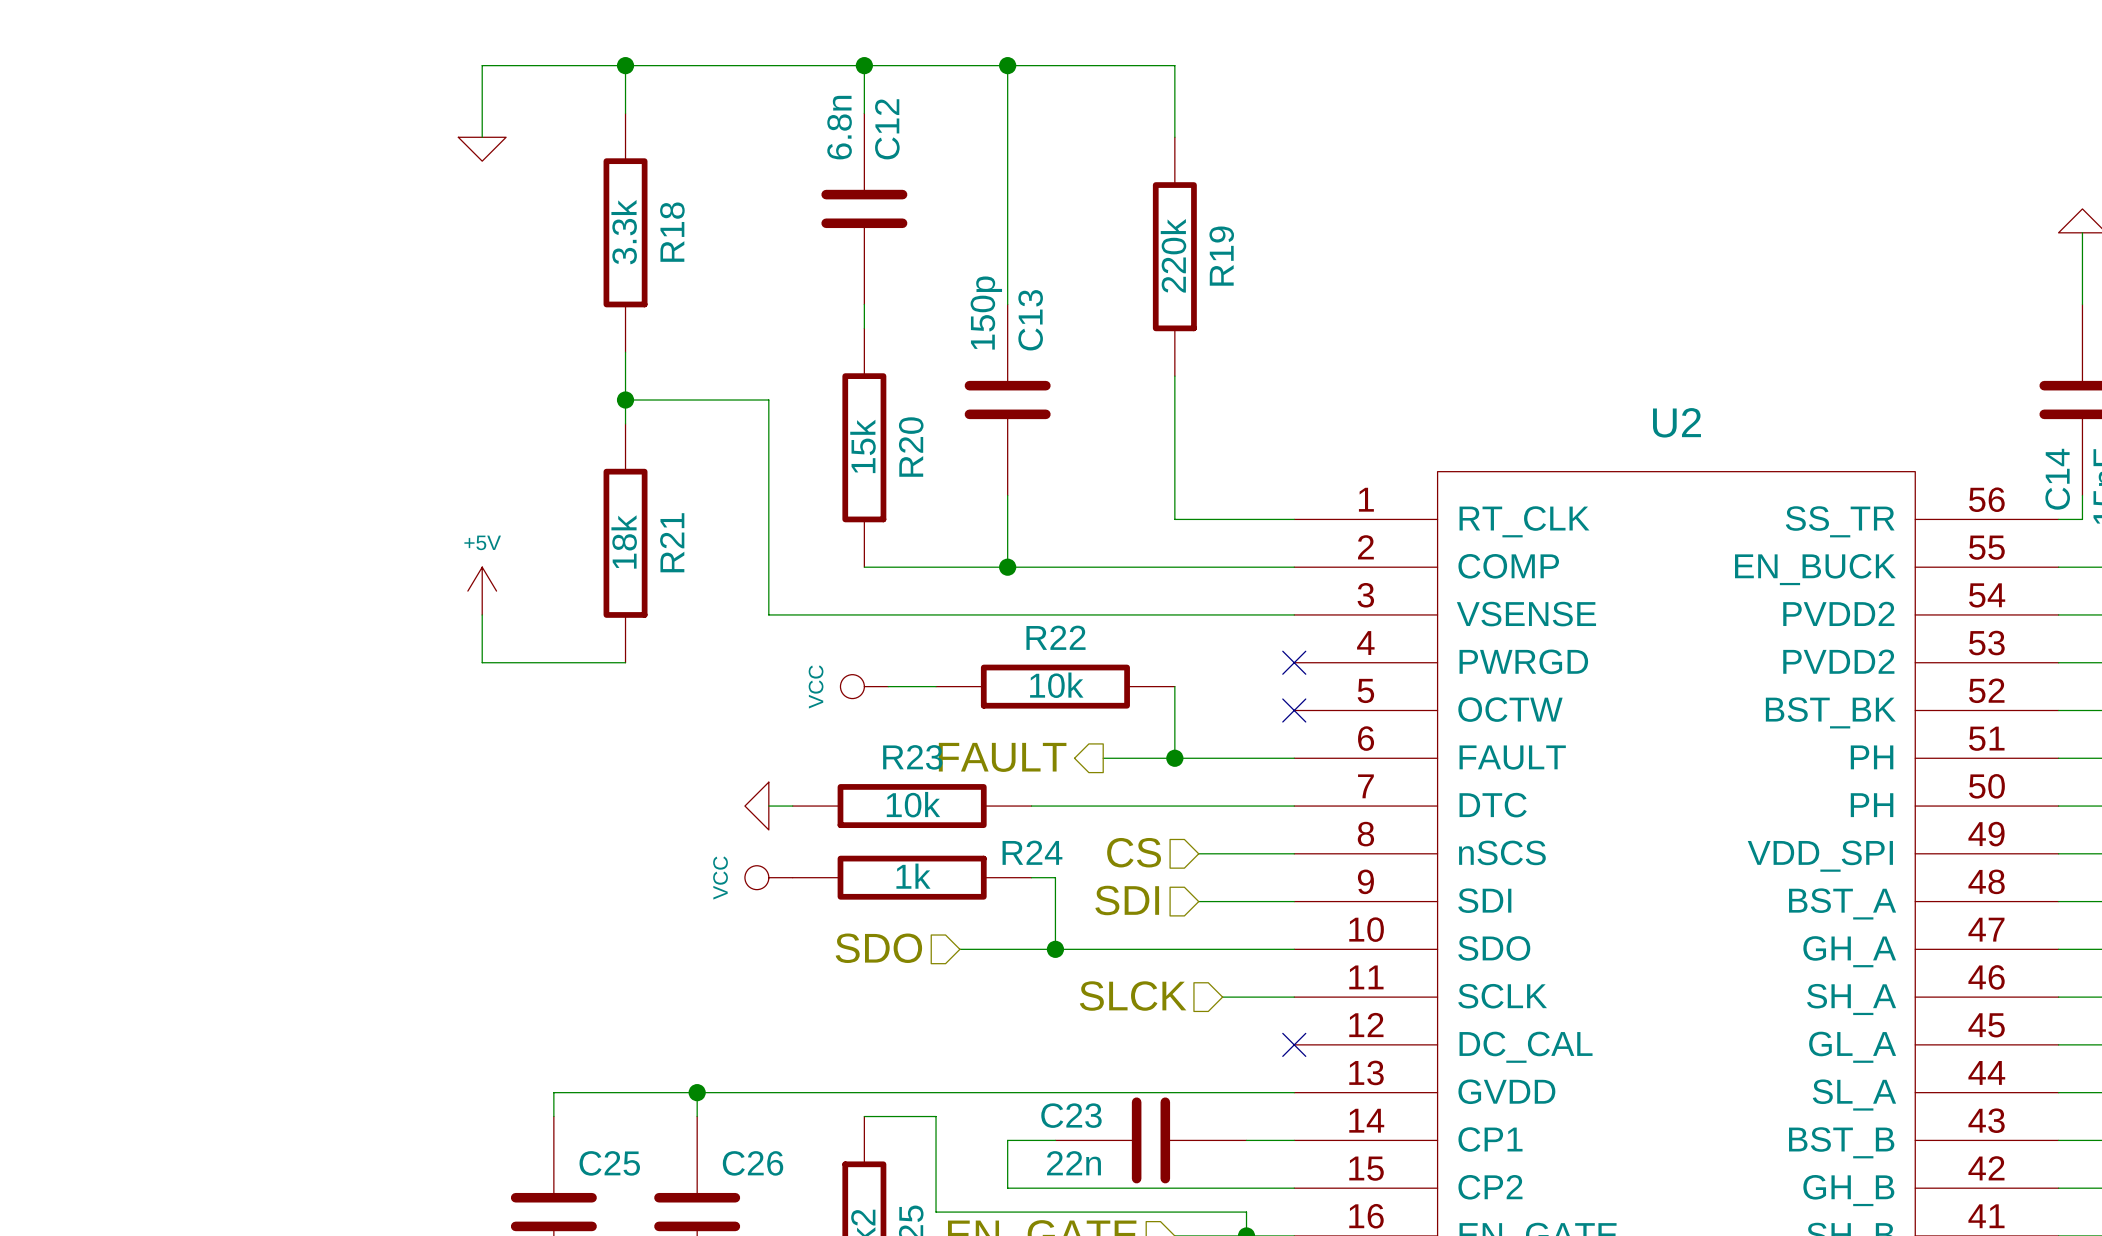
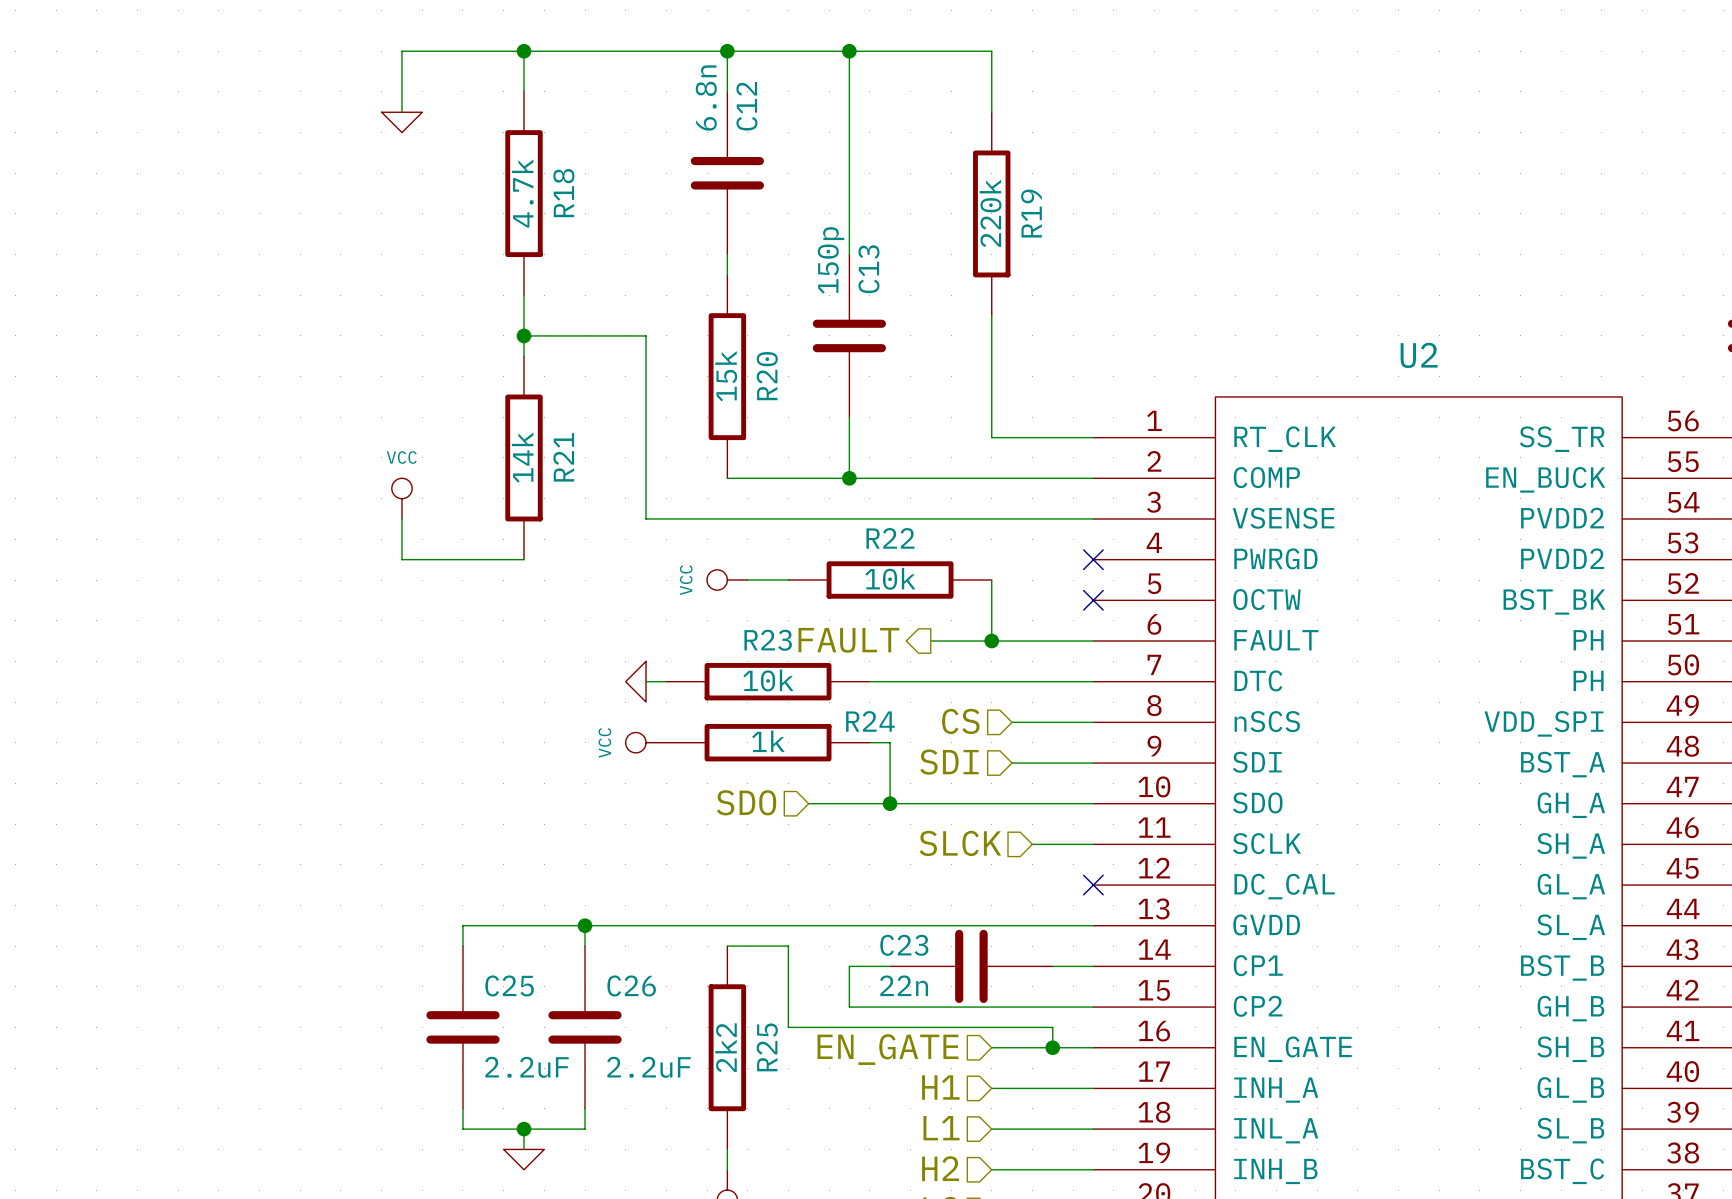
R18 value: 3.3k (624, 232) -> 4.7k (522, 193)
R21 value: 18k (624, 541) -> 14k (522, 457)
power symbol: +5V (482, 591) -> VCC (401, 498)

